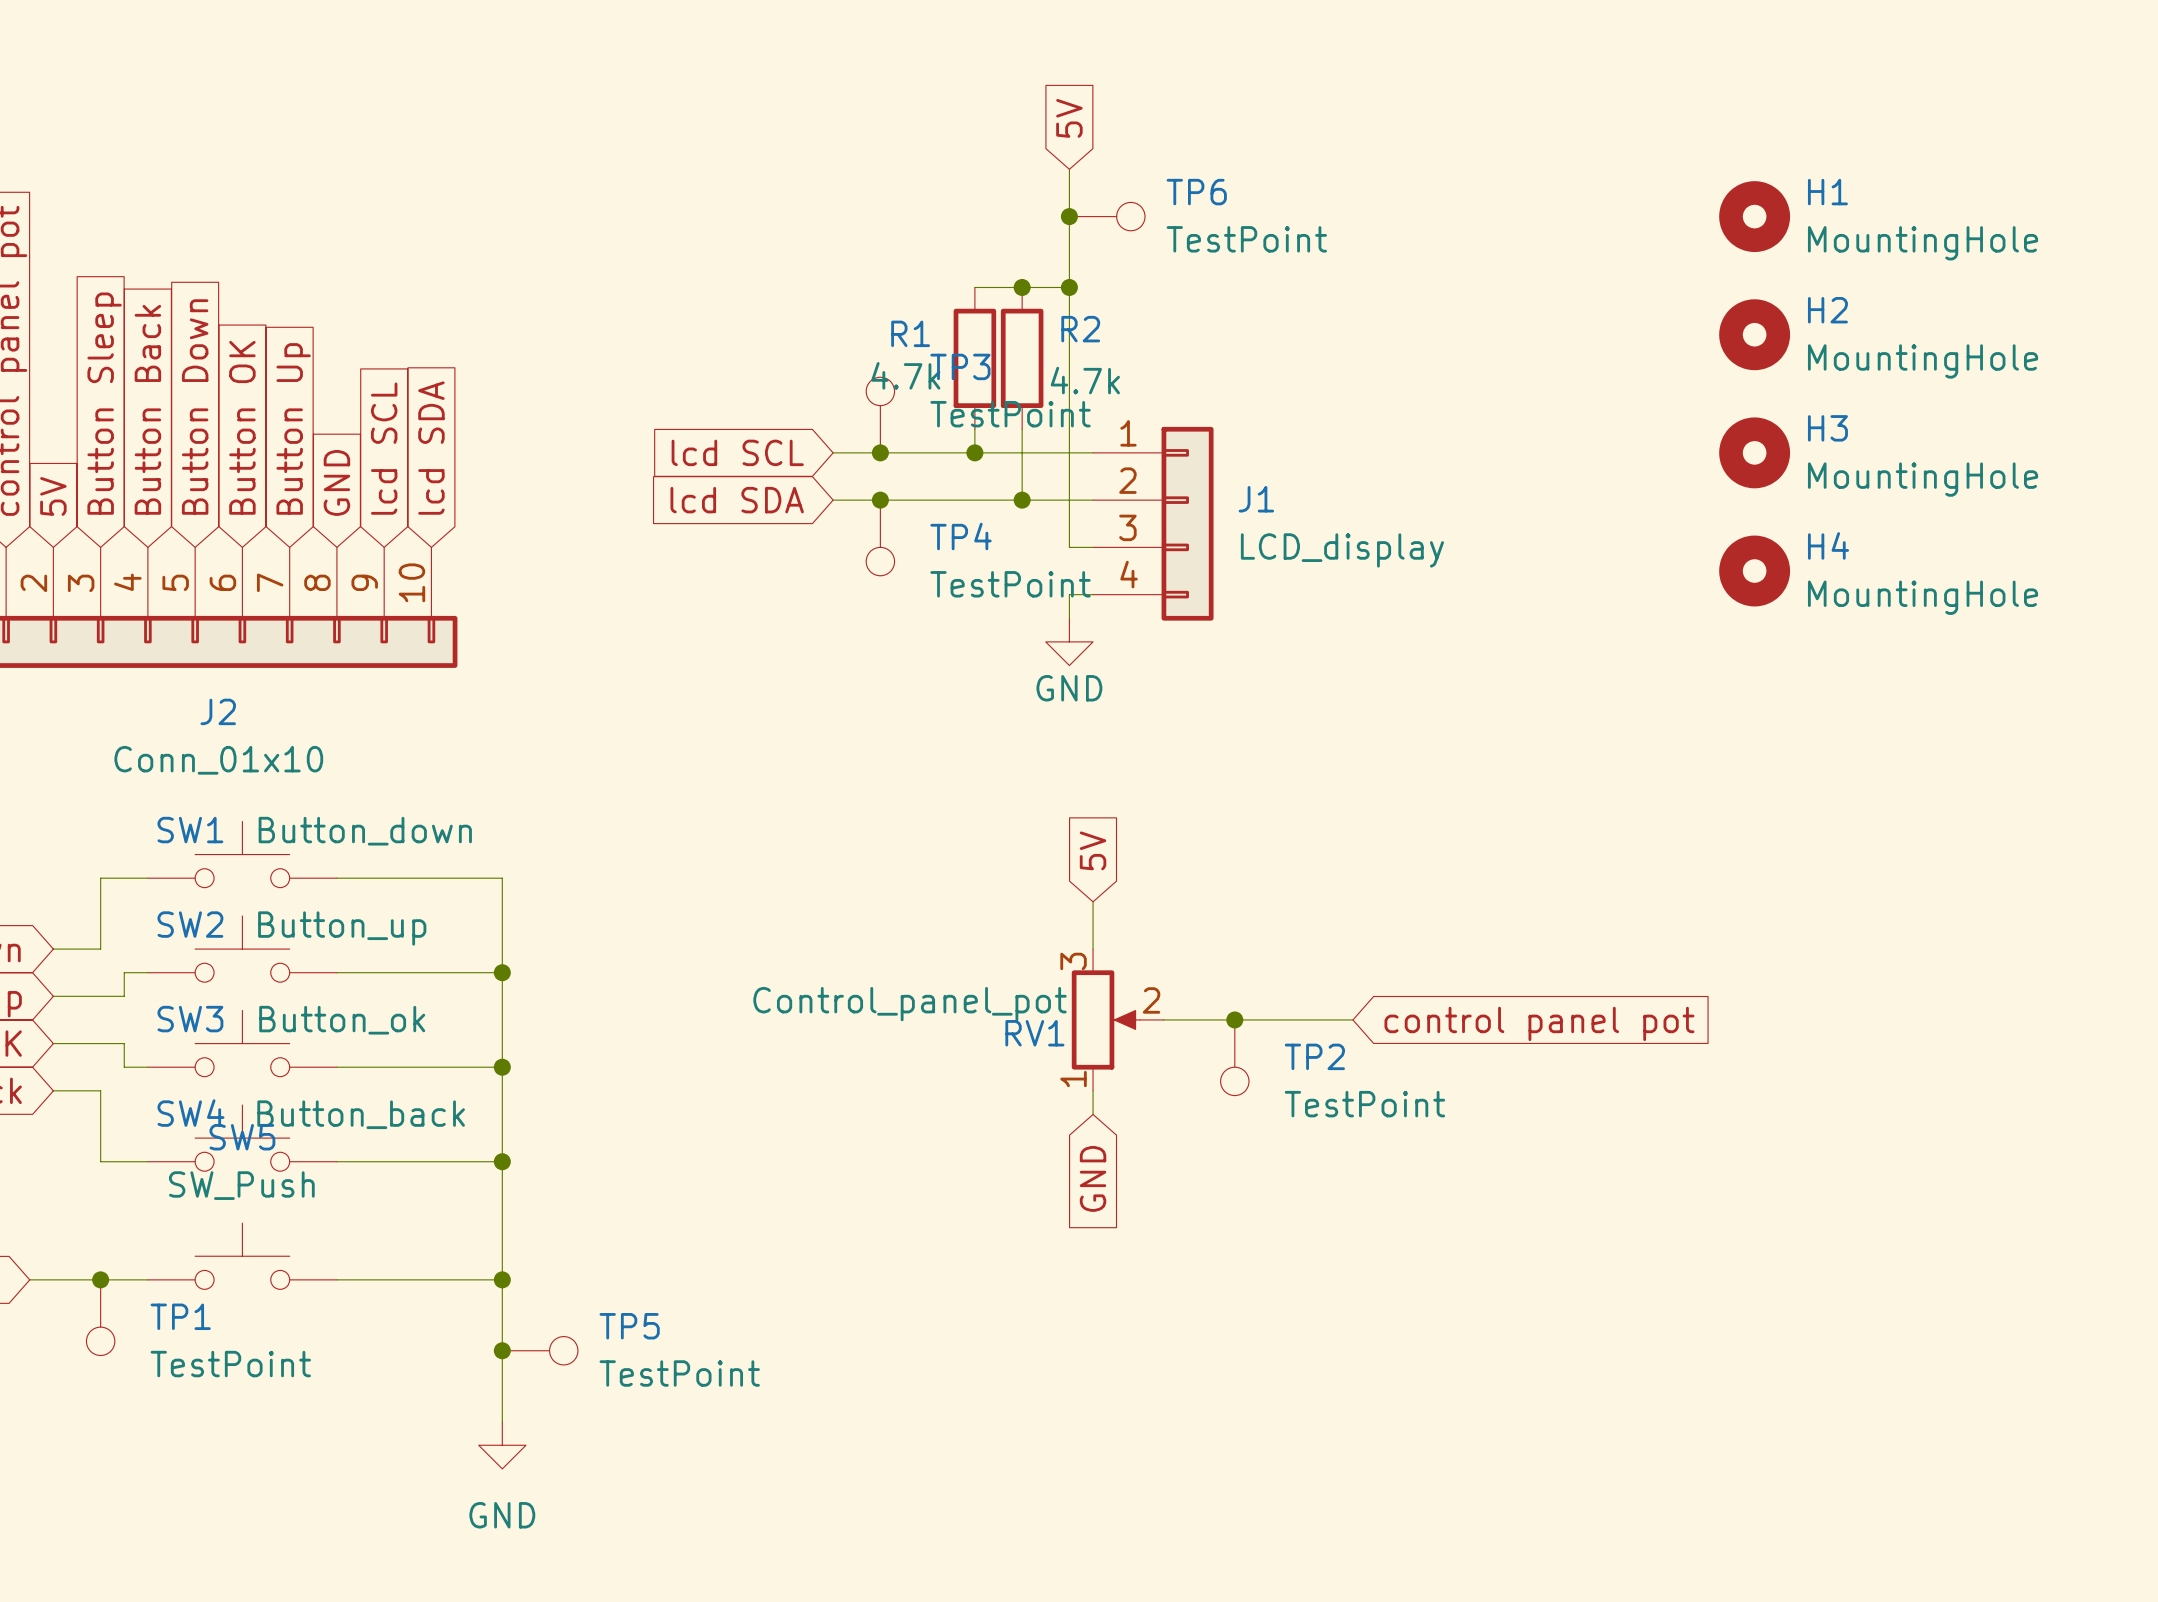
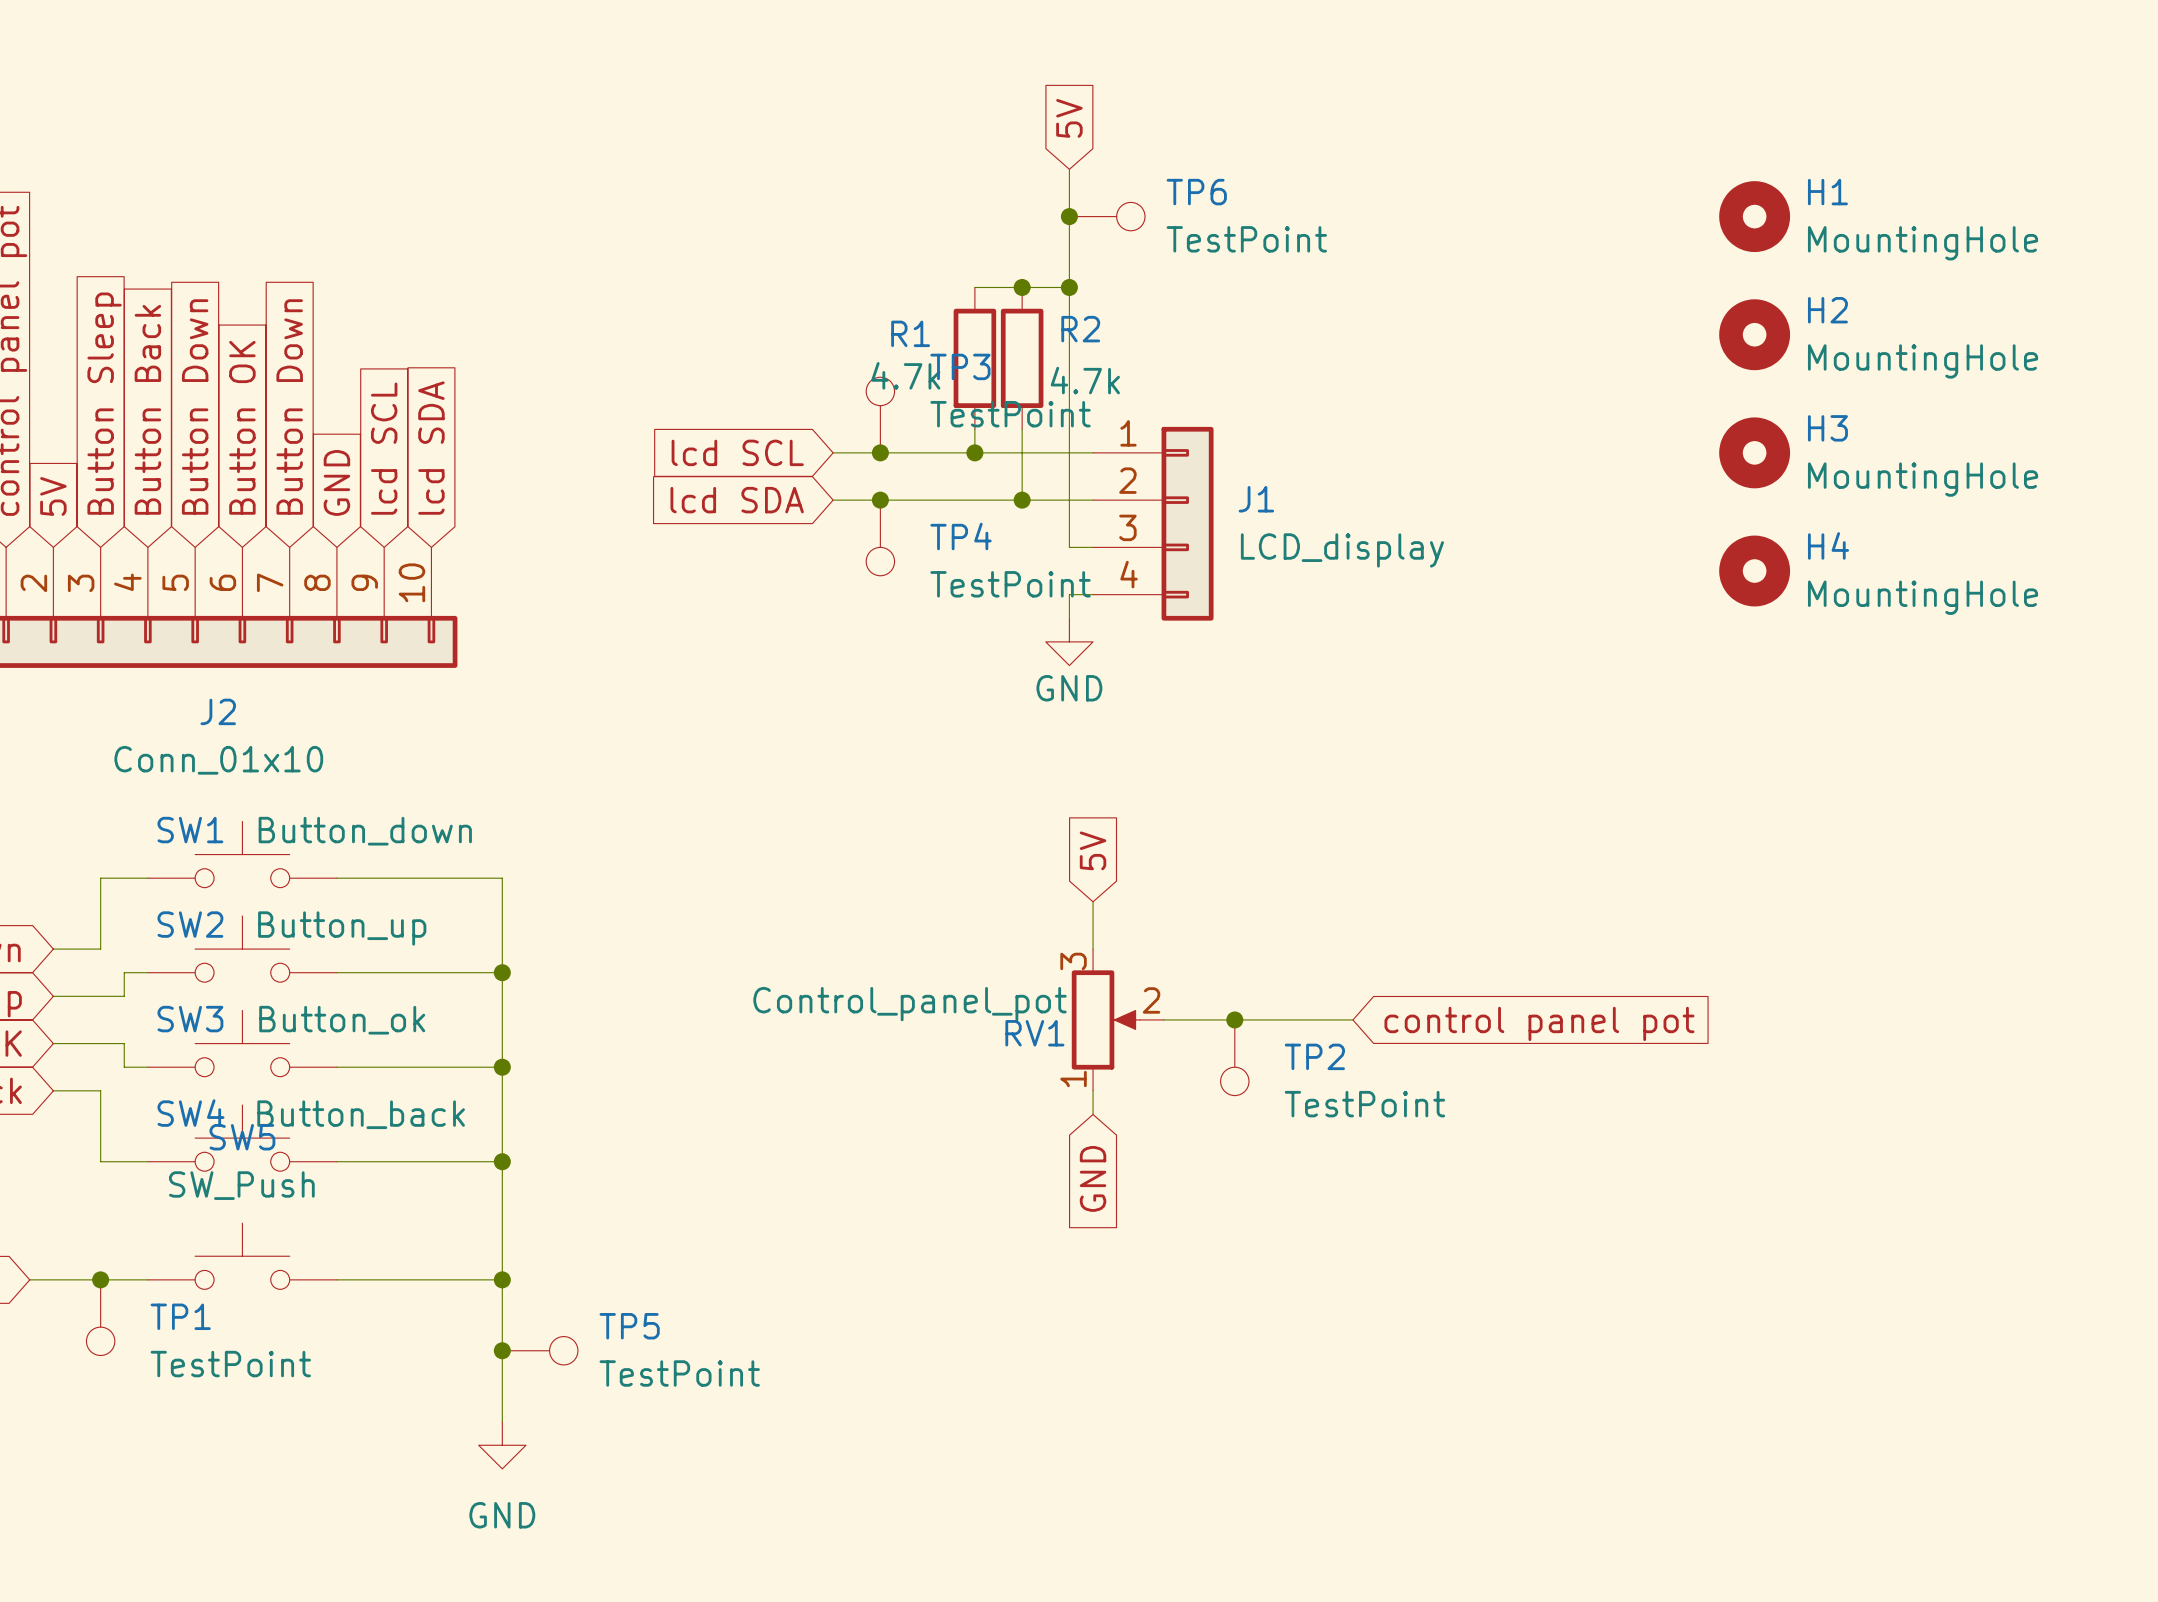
global label: Button Up (293, 428) -> Button Down (289, 406)

